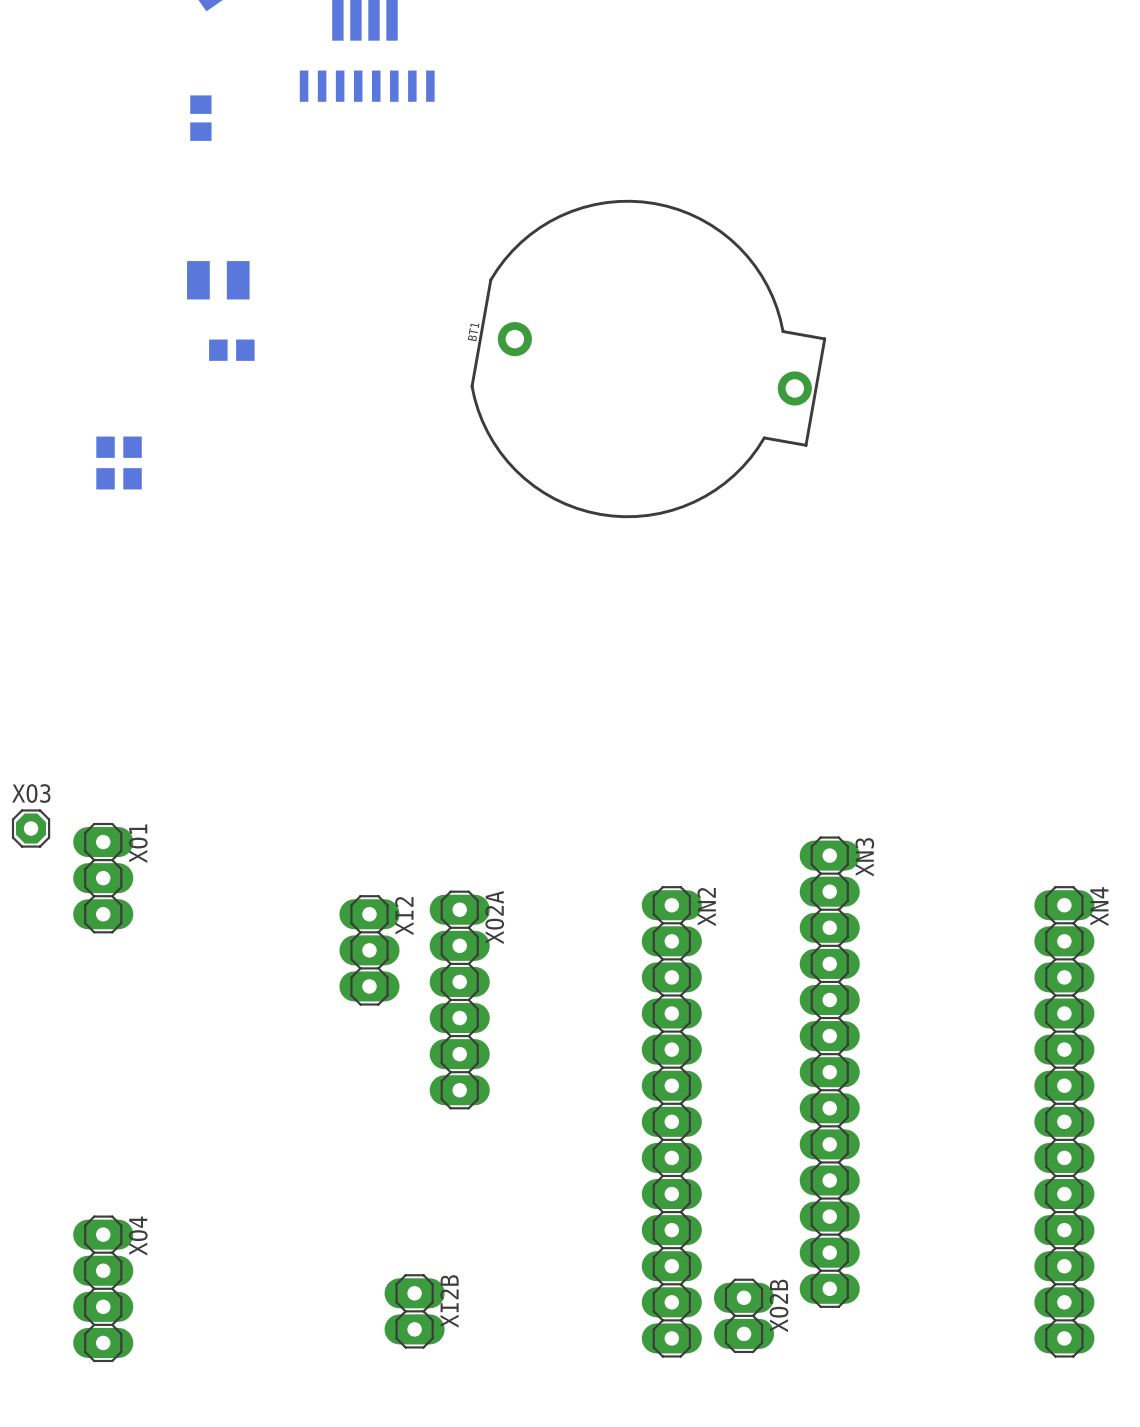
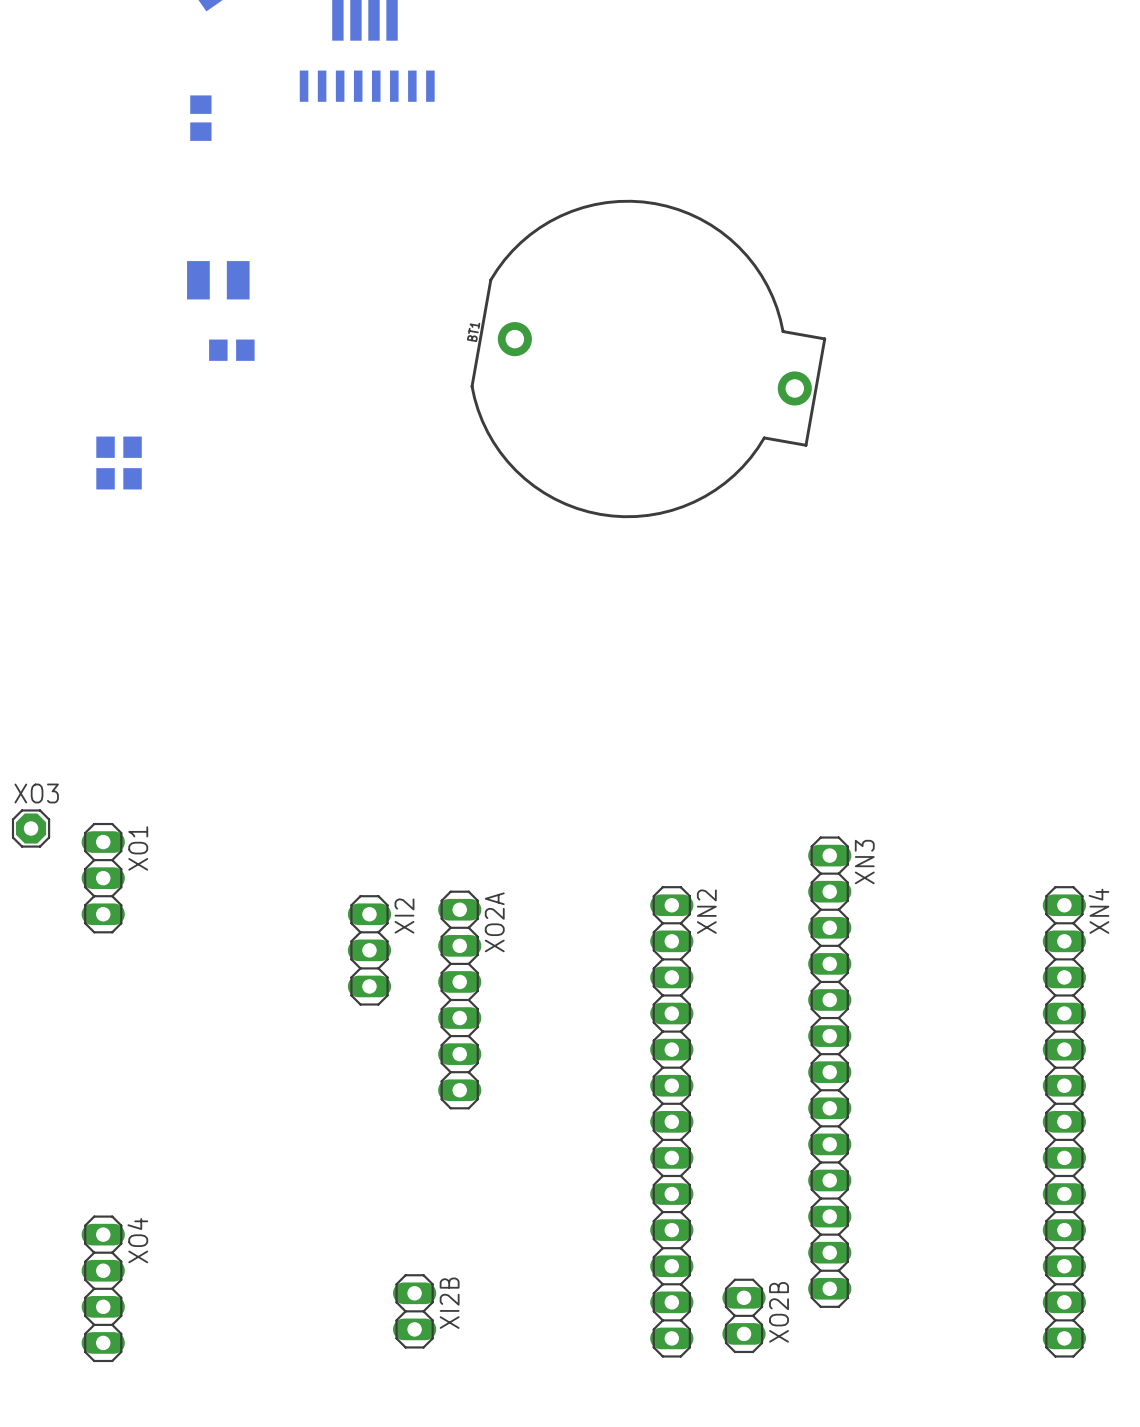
XO1 footprint: [73, 822, 134, 934] -> [81, 822, 125, 934]
XN3 footprint: [799, 836, 860, 1308] -> [808, 836, 852, 1308]
XN2 footprint: [641, 886, 702, 1358] -> [650, 886, 694, 1358]
XN4 footprint: [1034, 886, 1095, 1358] -> [1042, 886, 1087, 1358]
XO2A footprint: [429, 890, 490, 1110] -> [438, 890, 482, 1110]
XI2 footprint: [339, 895, 400, 1006] -> [347, 895, 392, 1006]
XO4 footprint: [73, 1215, 134, 1363] -> [81, 1215, 125, 1363]
XI2B footprint: [384, 1274, 445, 1349] -> [392, 1274, 437, 1349]
XO2B footprint: [713, 1278, 775, 1354] -> [722, 1278, 766, 1354]

